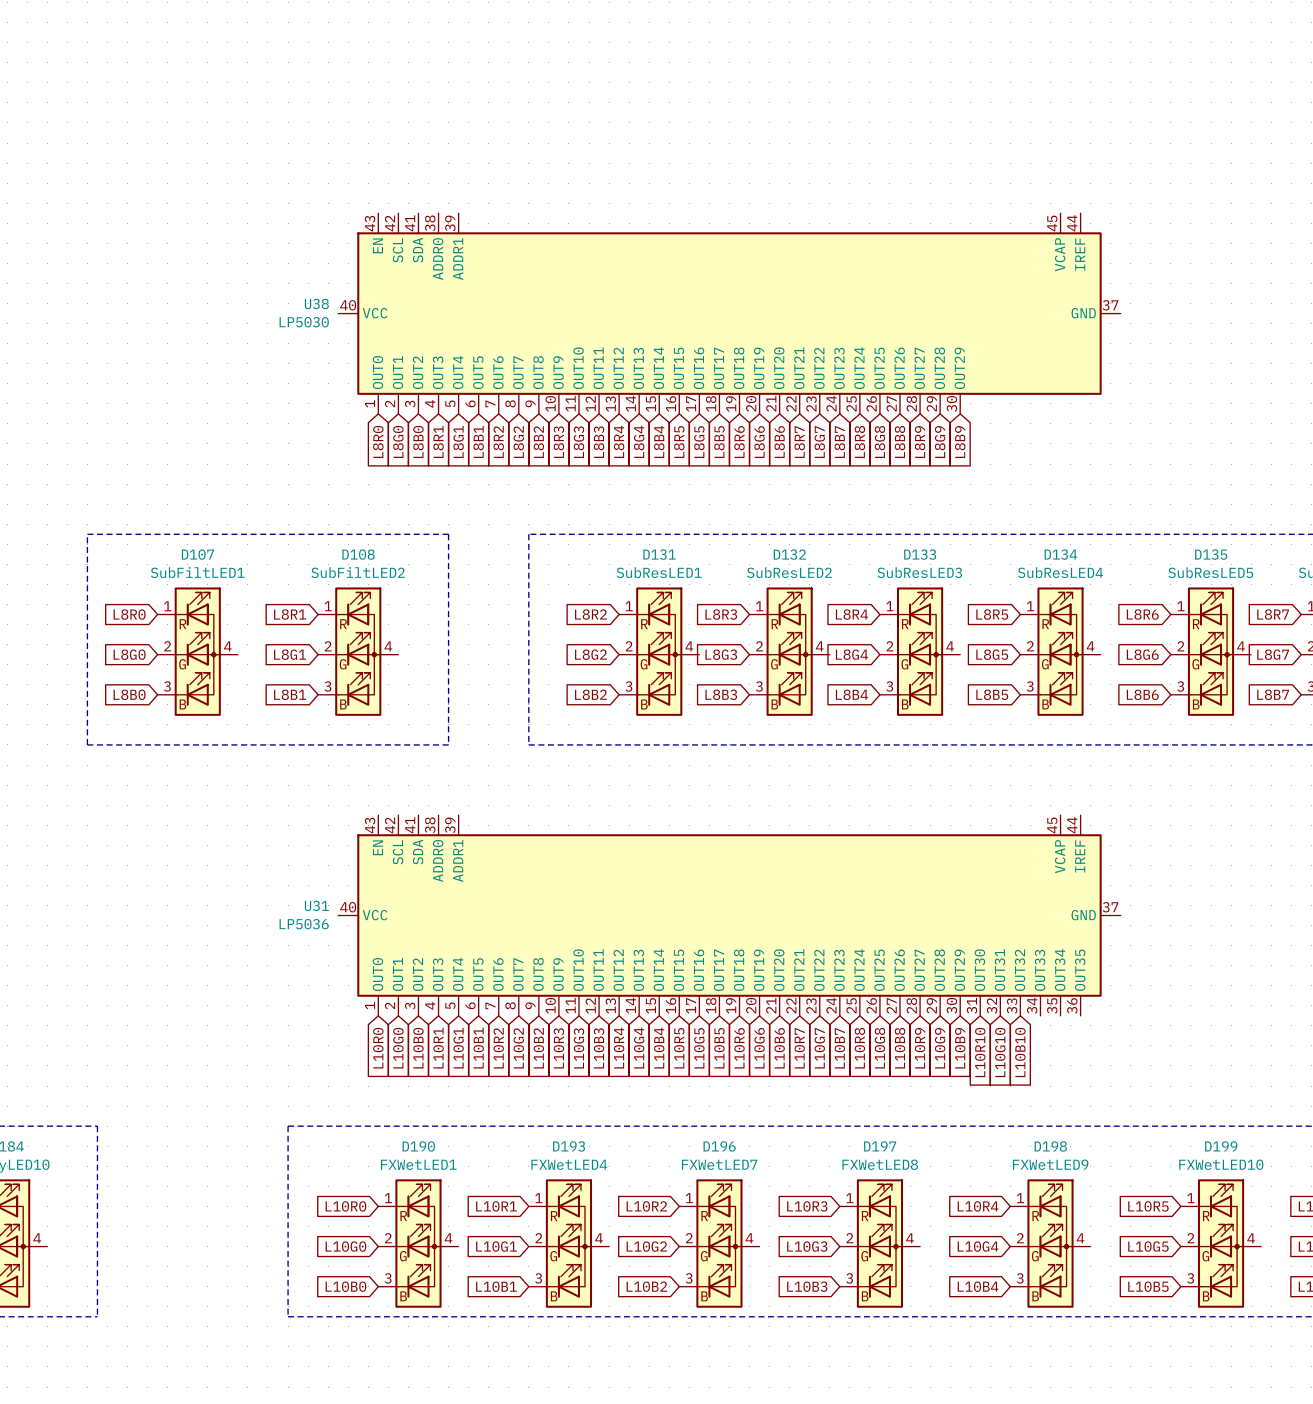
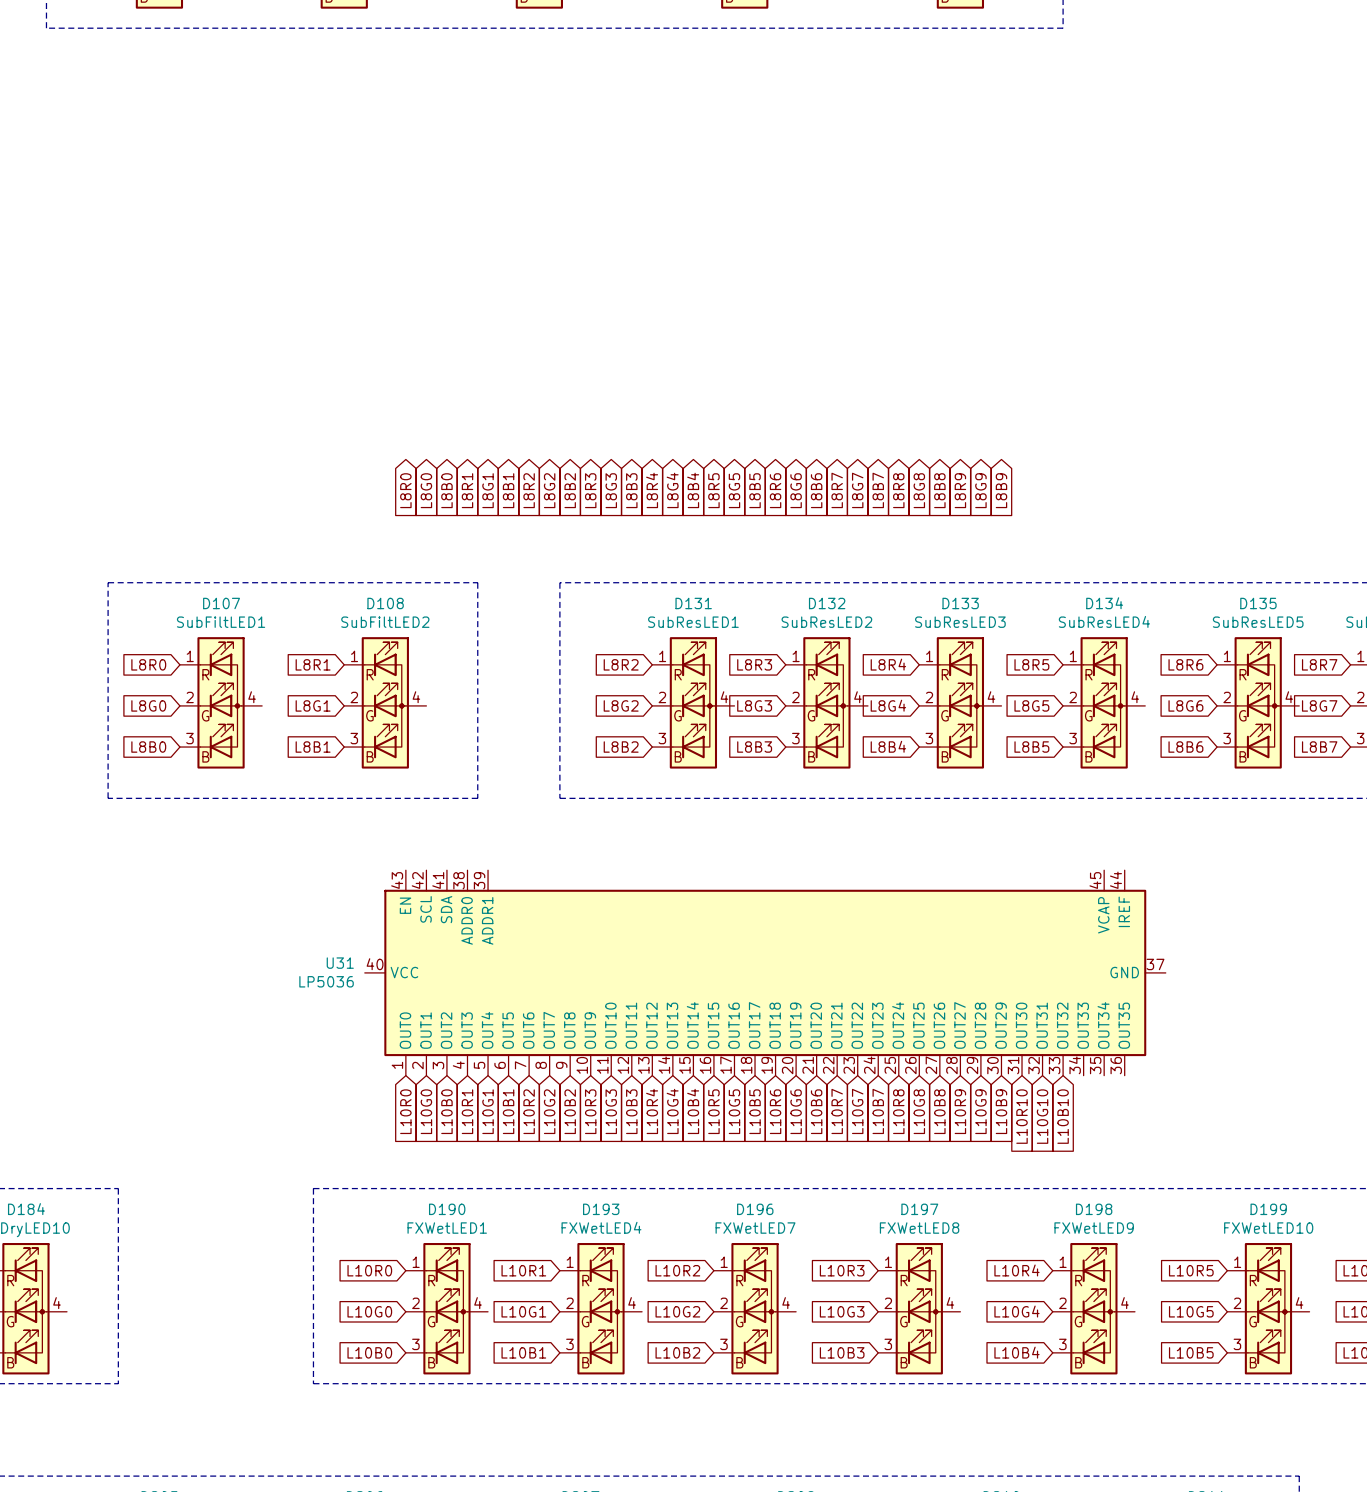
U38: LP5030 (729, 313) -> none

